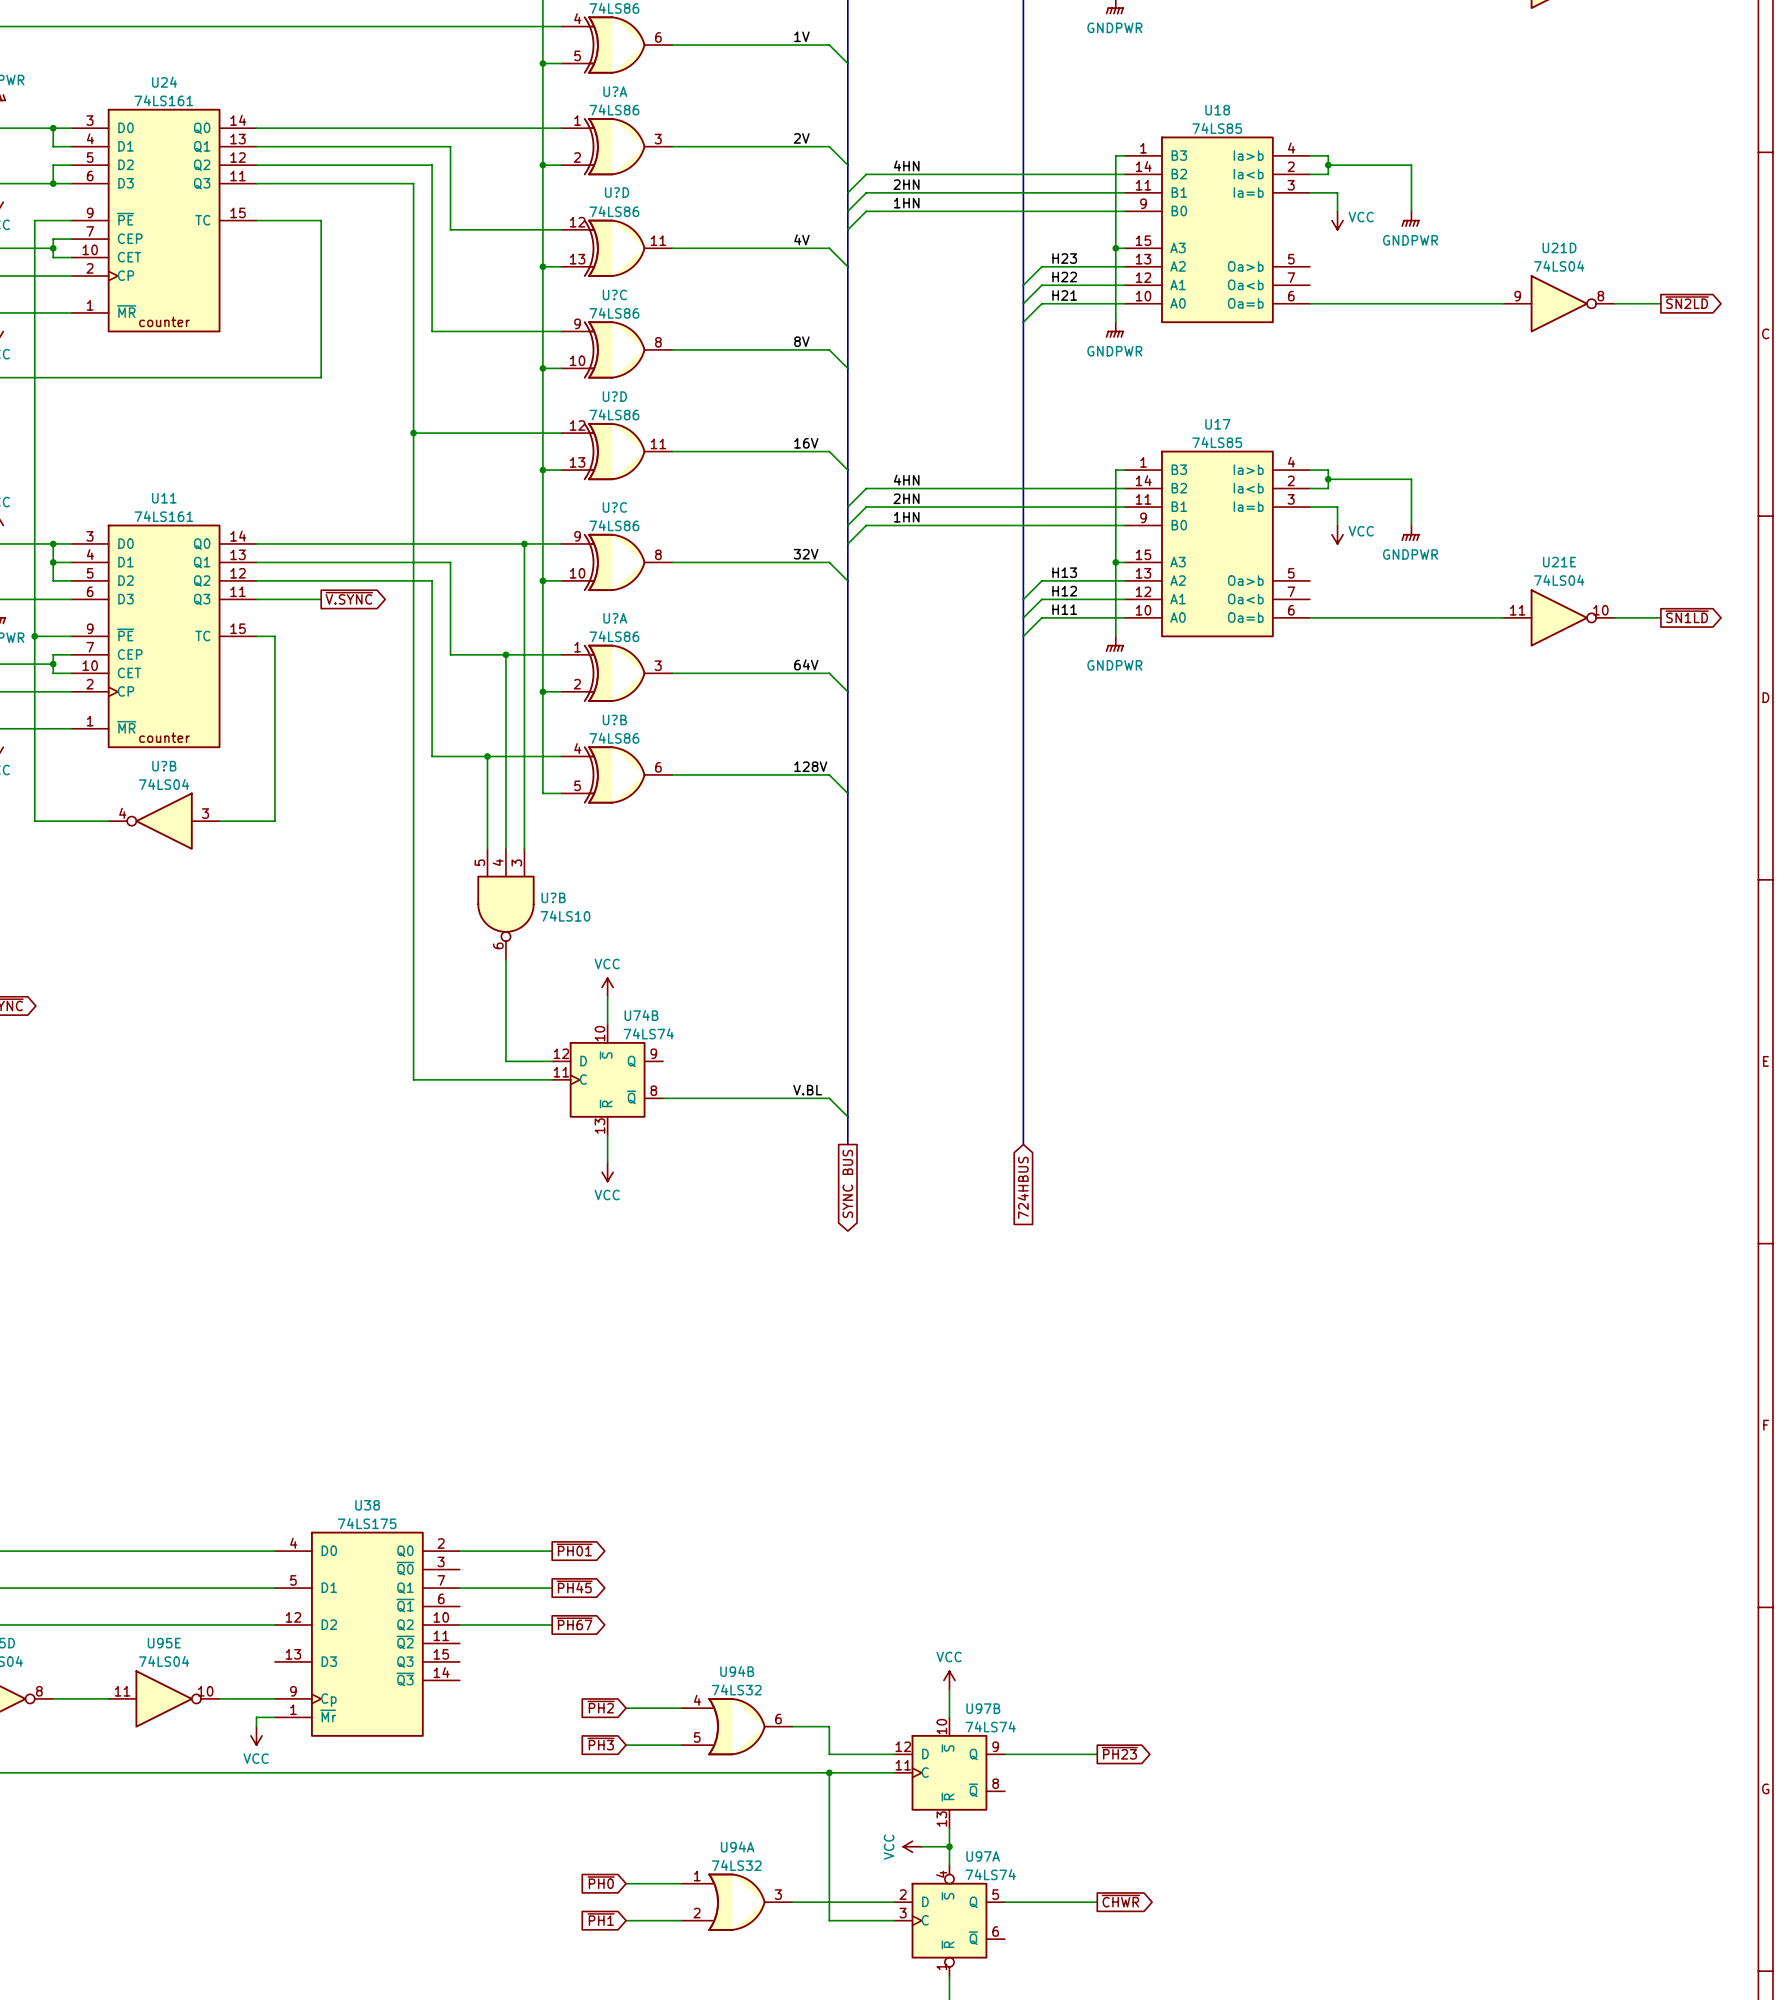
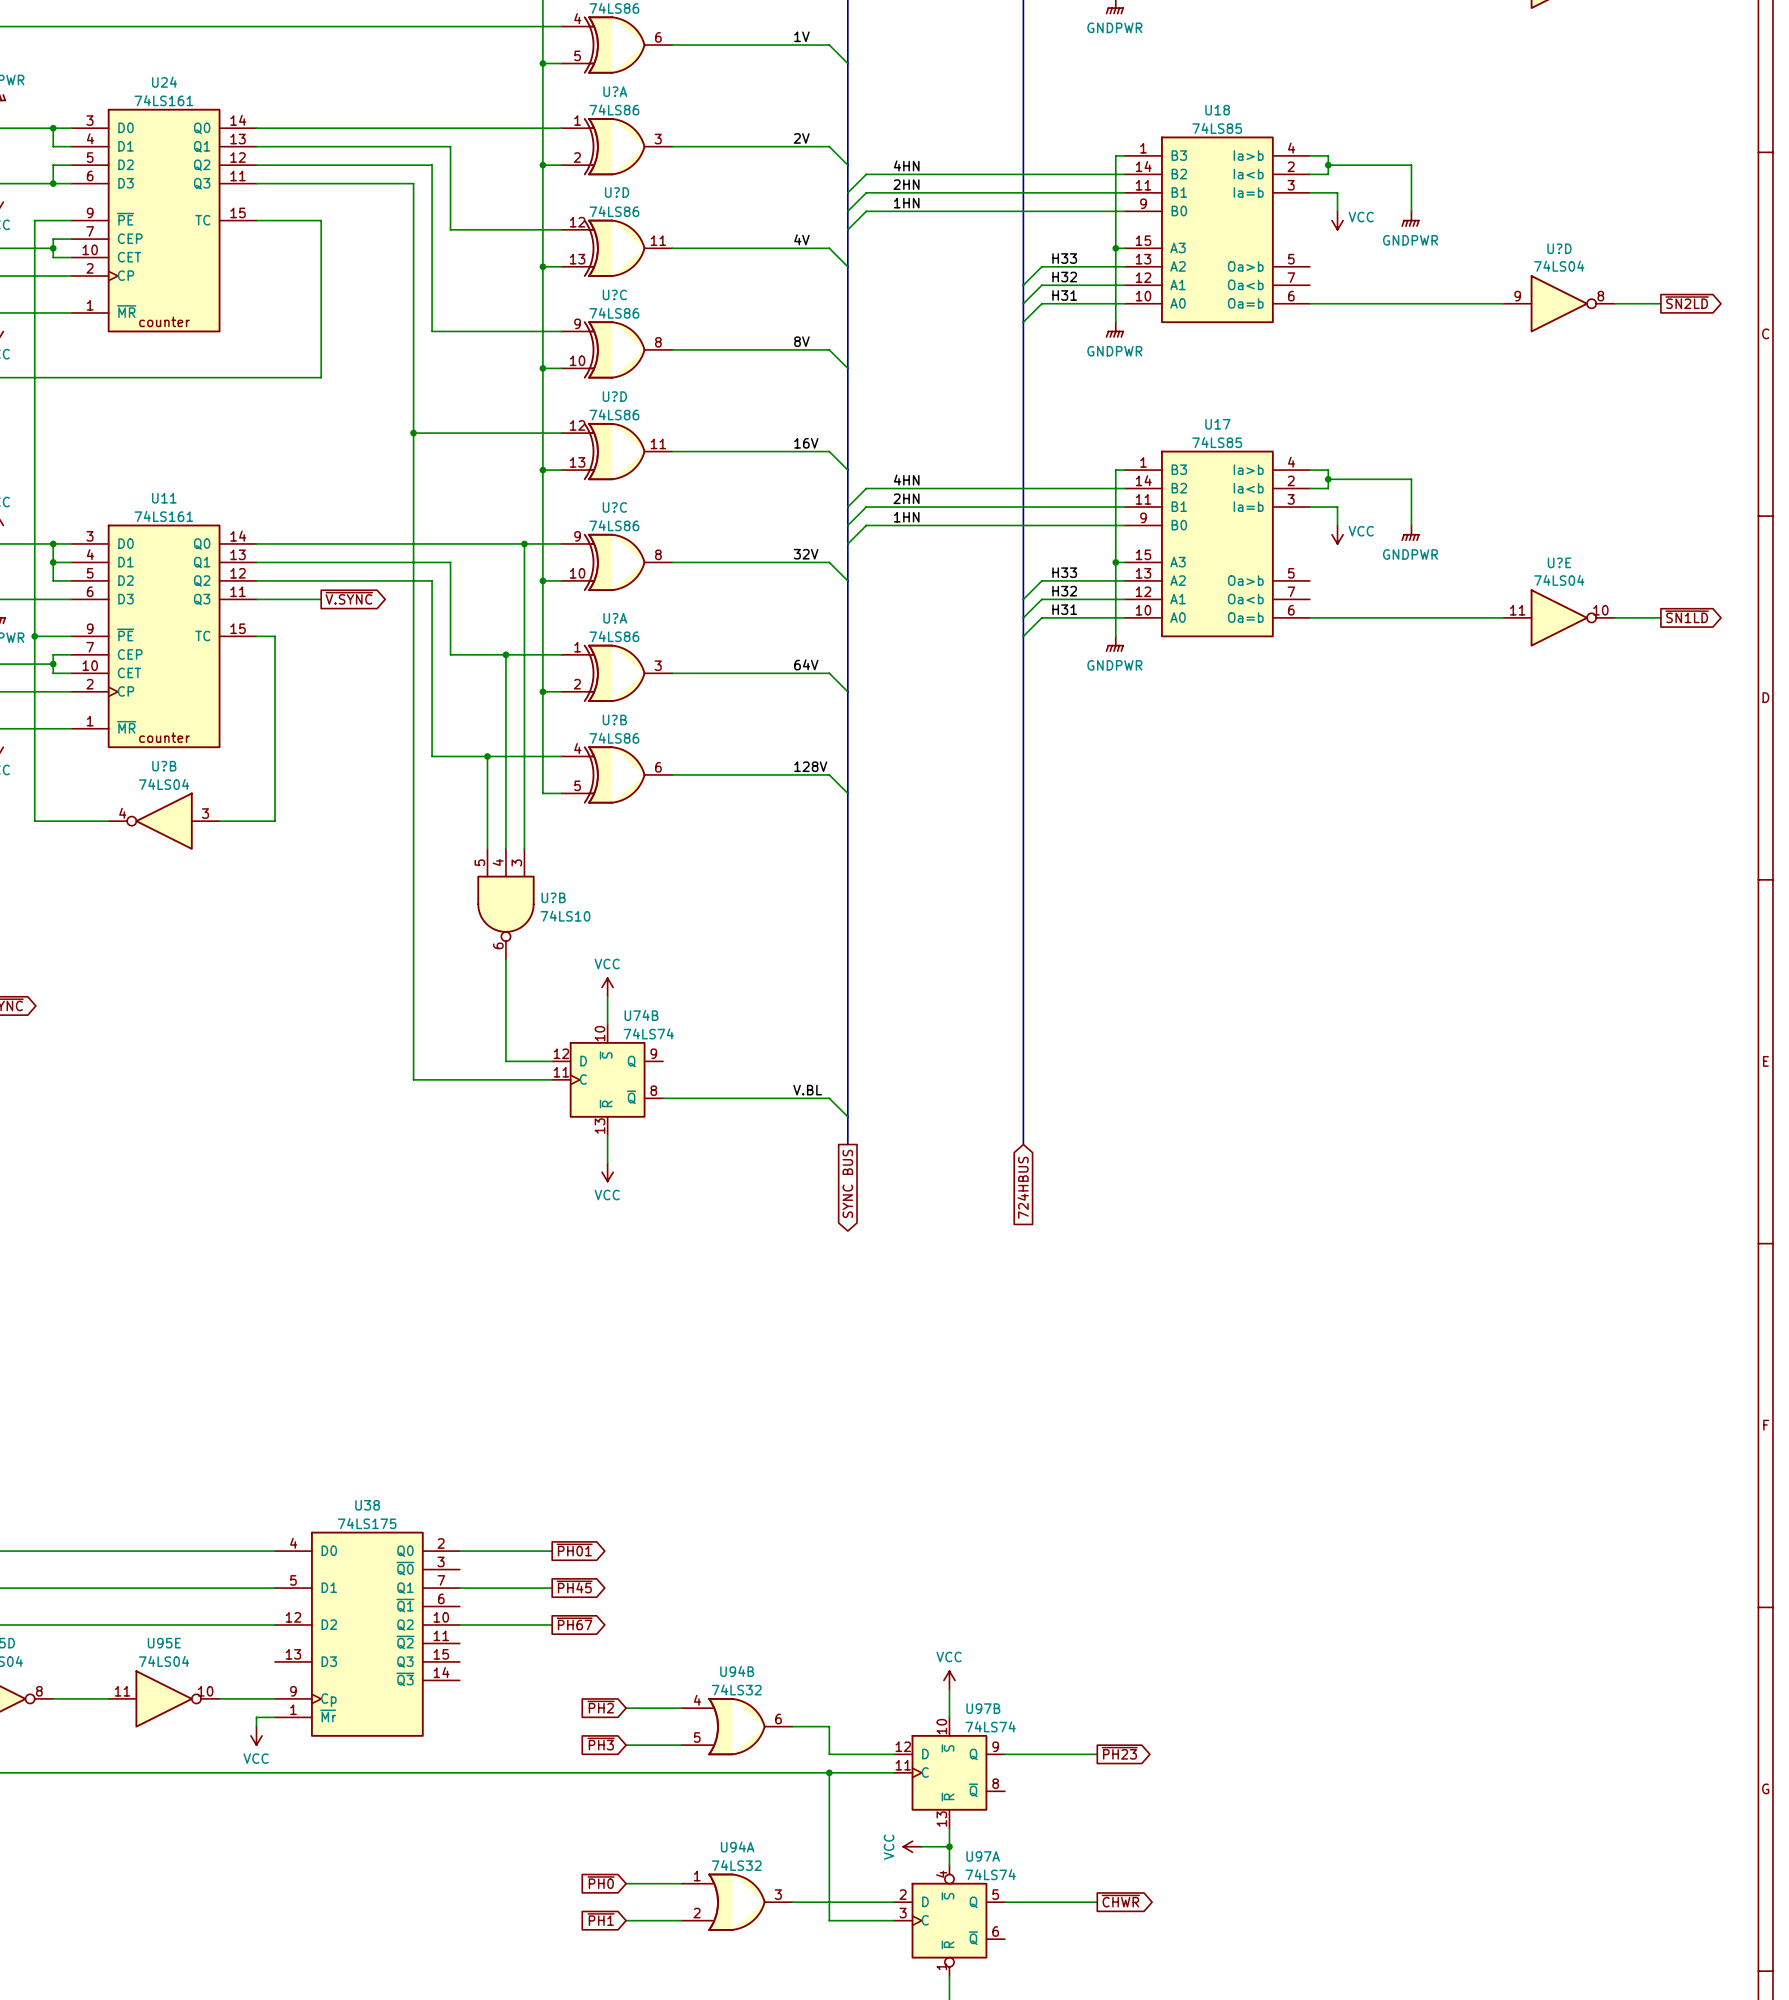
U21D name: U21D (1559, 247) -> U?D (1559, 248)
label: H23 (1064, 258) -> H33 (1064, 258)
label: H22 (1064, 277) -> H32 (1064, 277)
label: H21 (1064, 295) -> H31 (1064, 295)
U21E name: U21E (1559, 562) -> U?E (1559, 562)
label: H13 (1064, 572) -> H33 (1064, 572)
label: H12 (1064, 591) -> H32 (1064, 591)
label: H11 (1064, 609) -> H31 (1064, 609)

